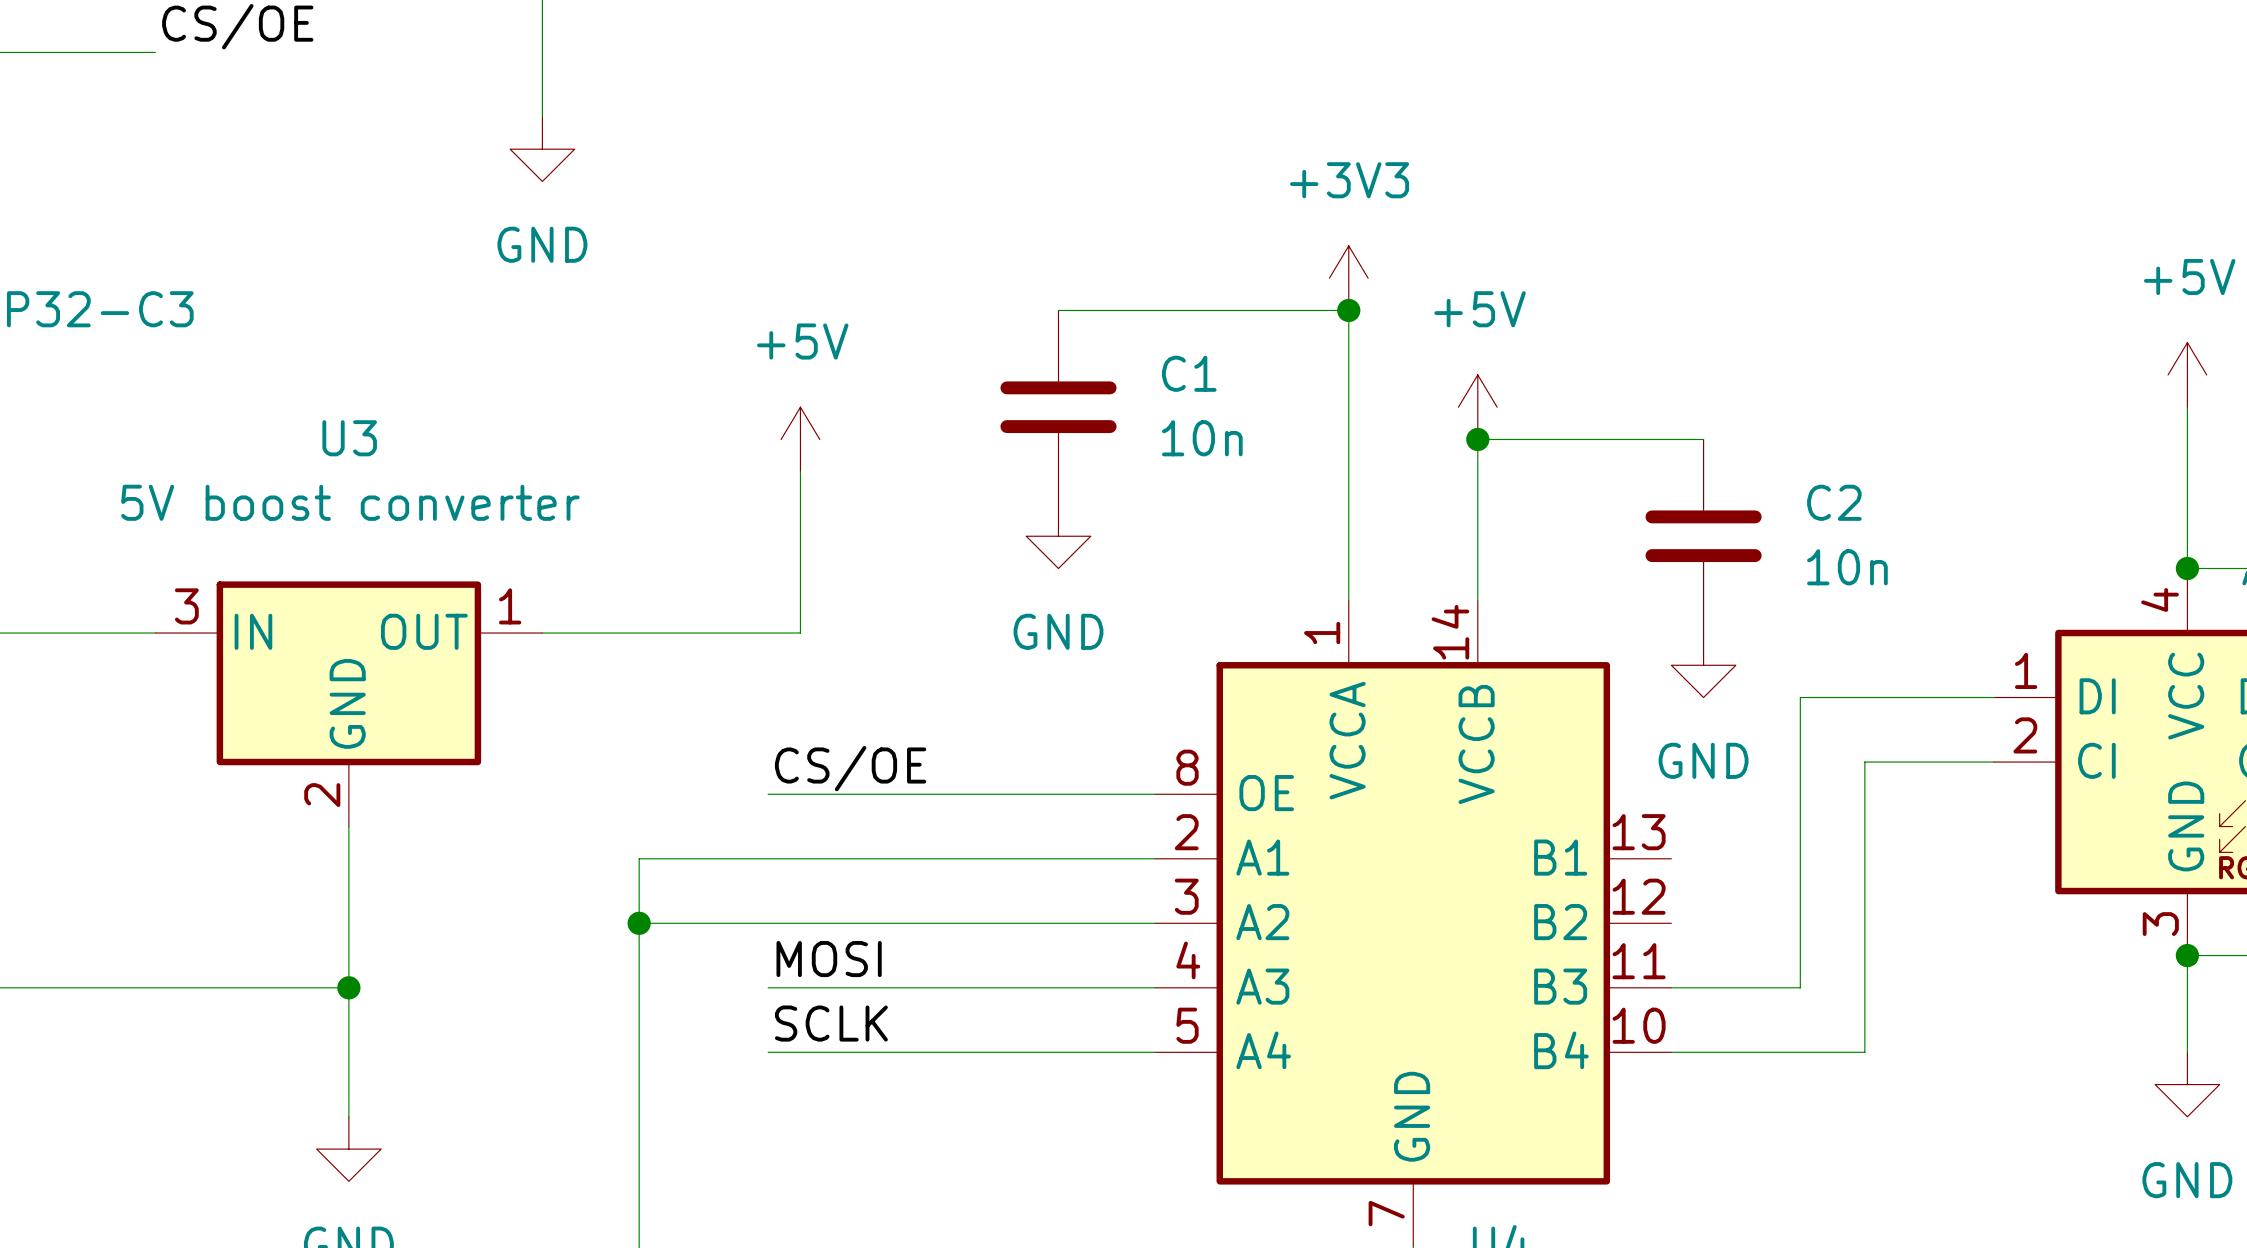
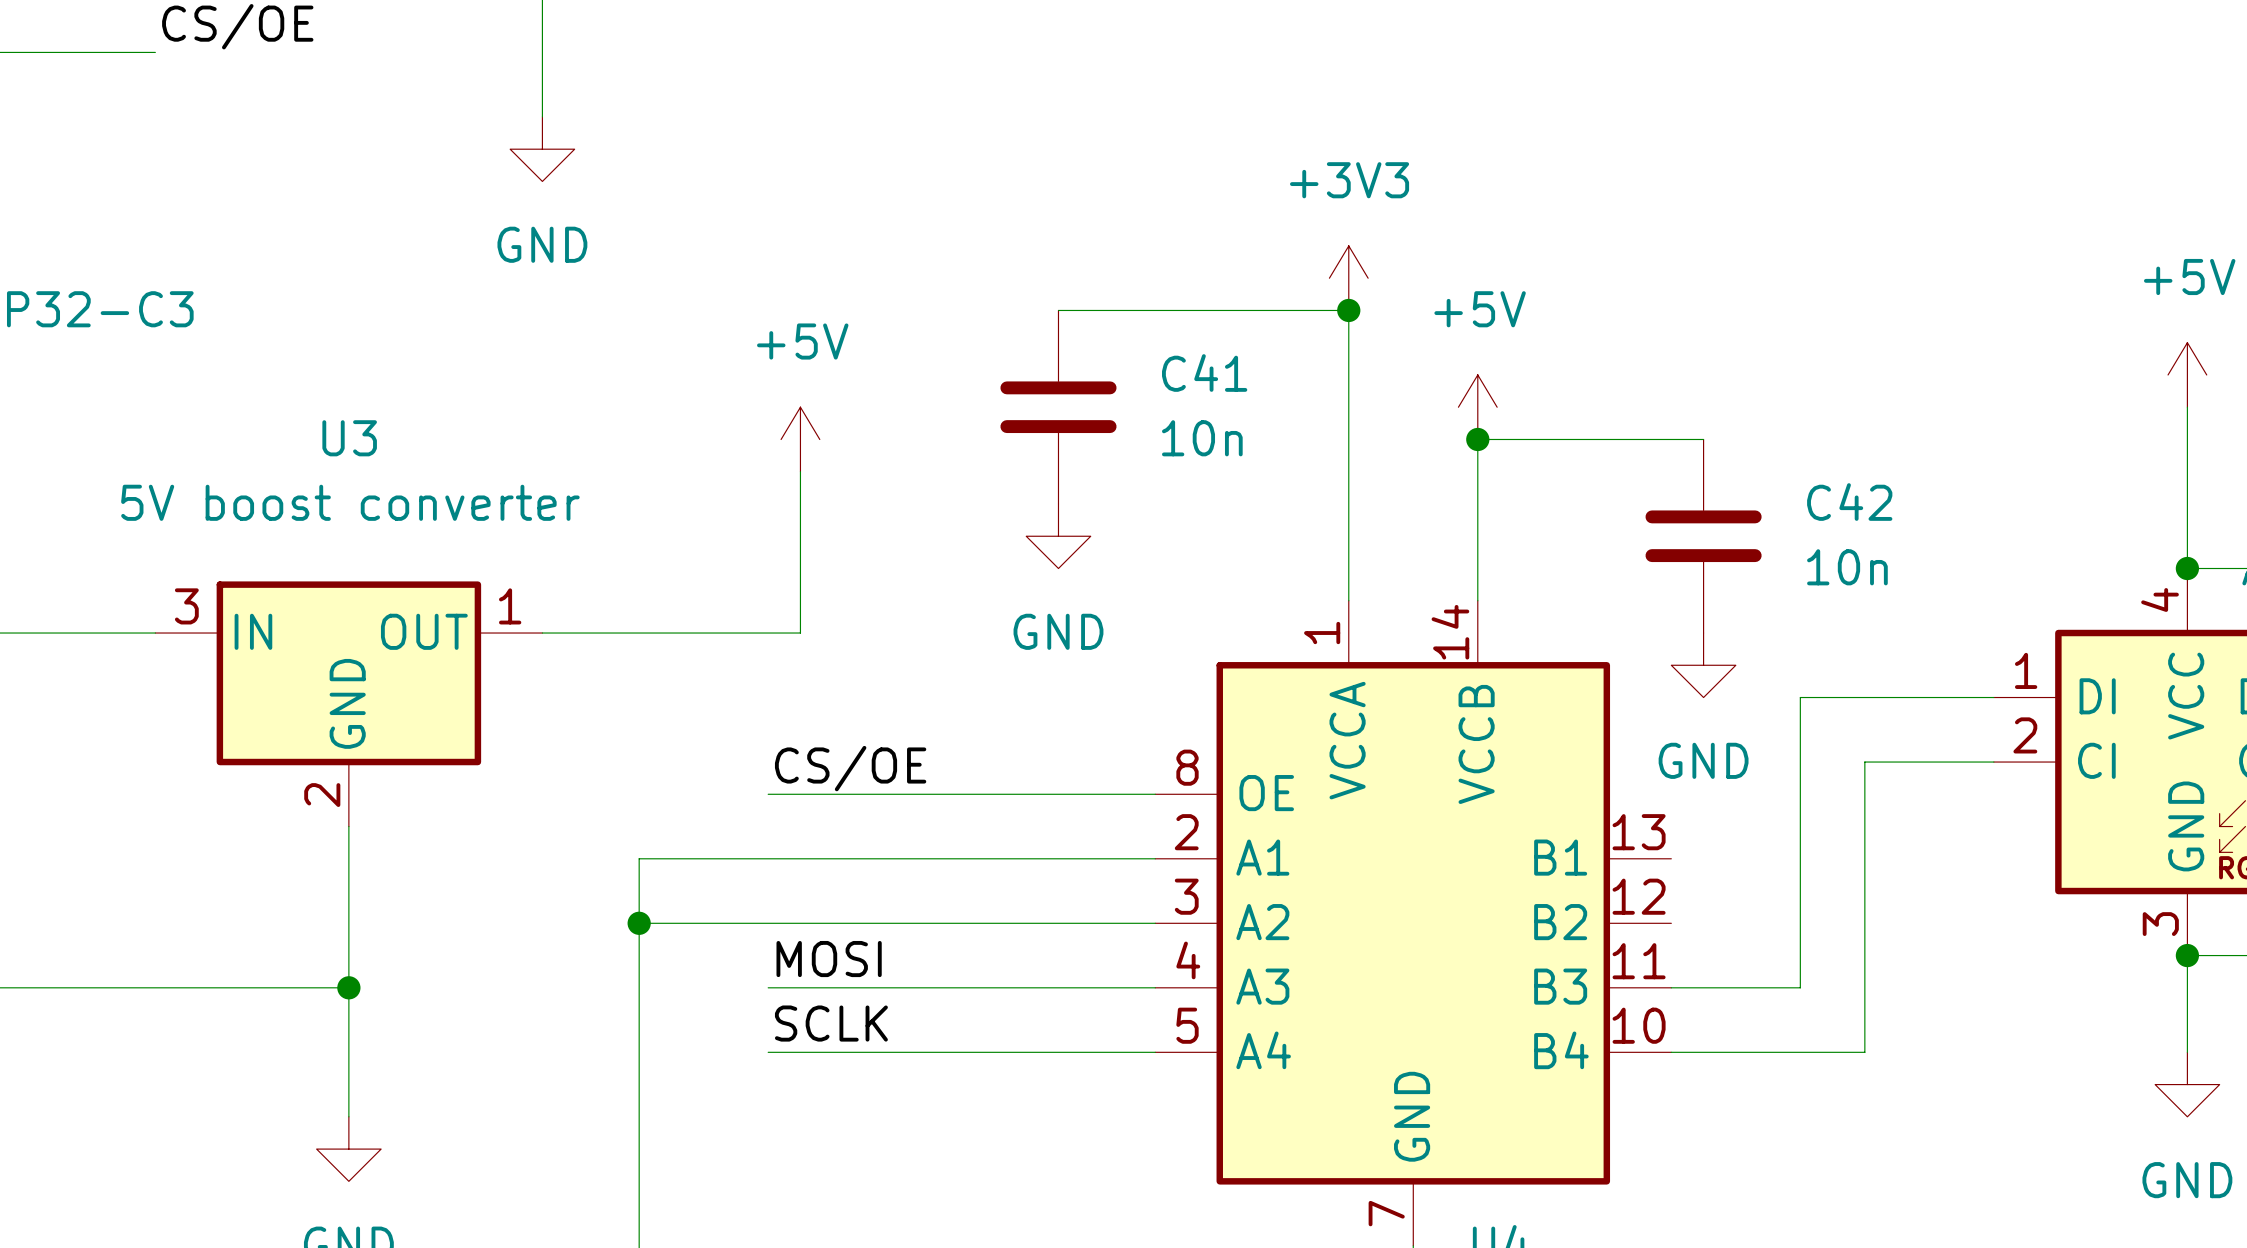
C1 name: C1 (1189, 373) -> C41 (1204, 373)
C2 name: C2 (1834, 502) -> C42 (1849, 502)

